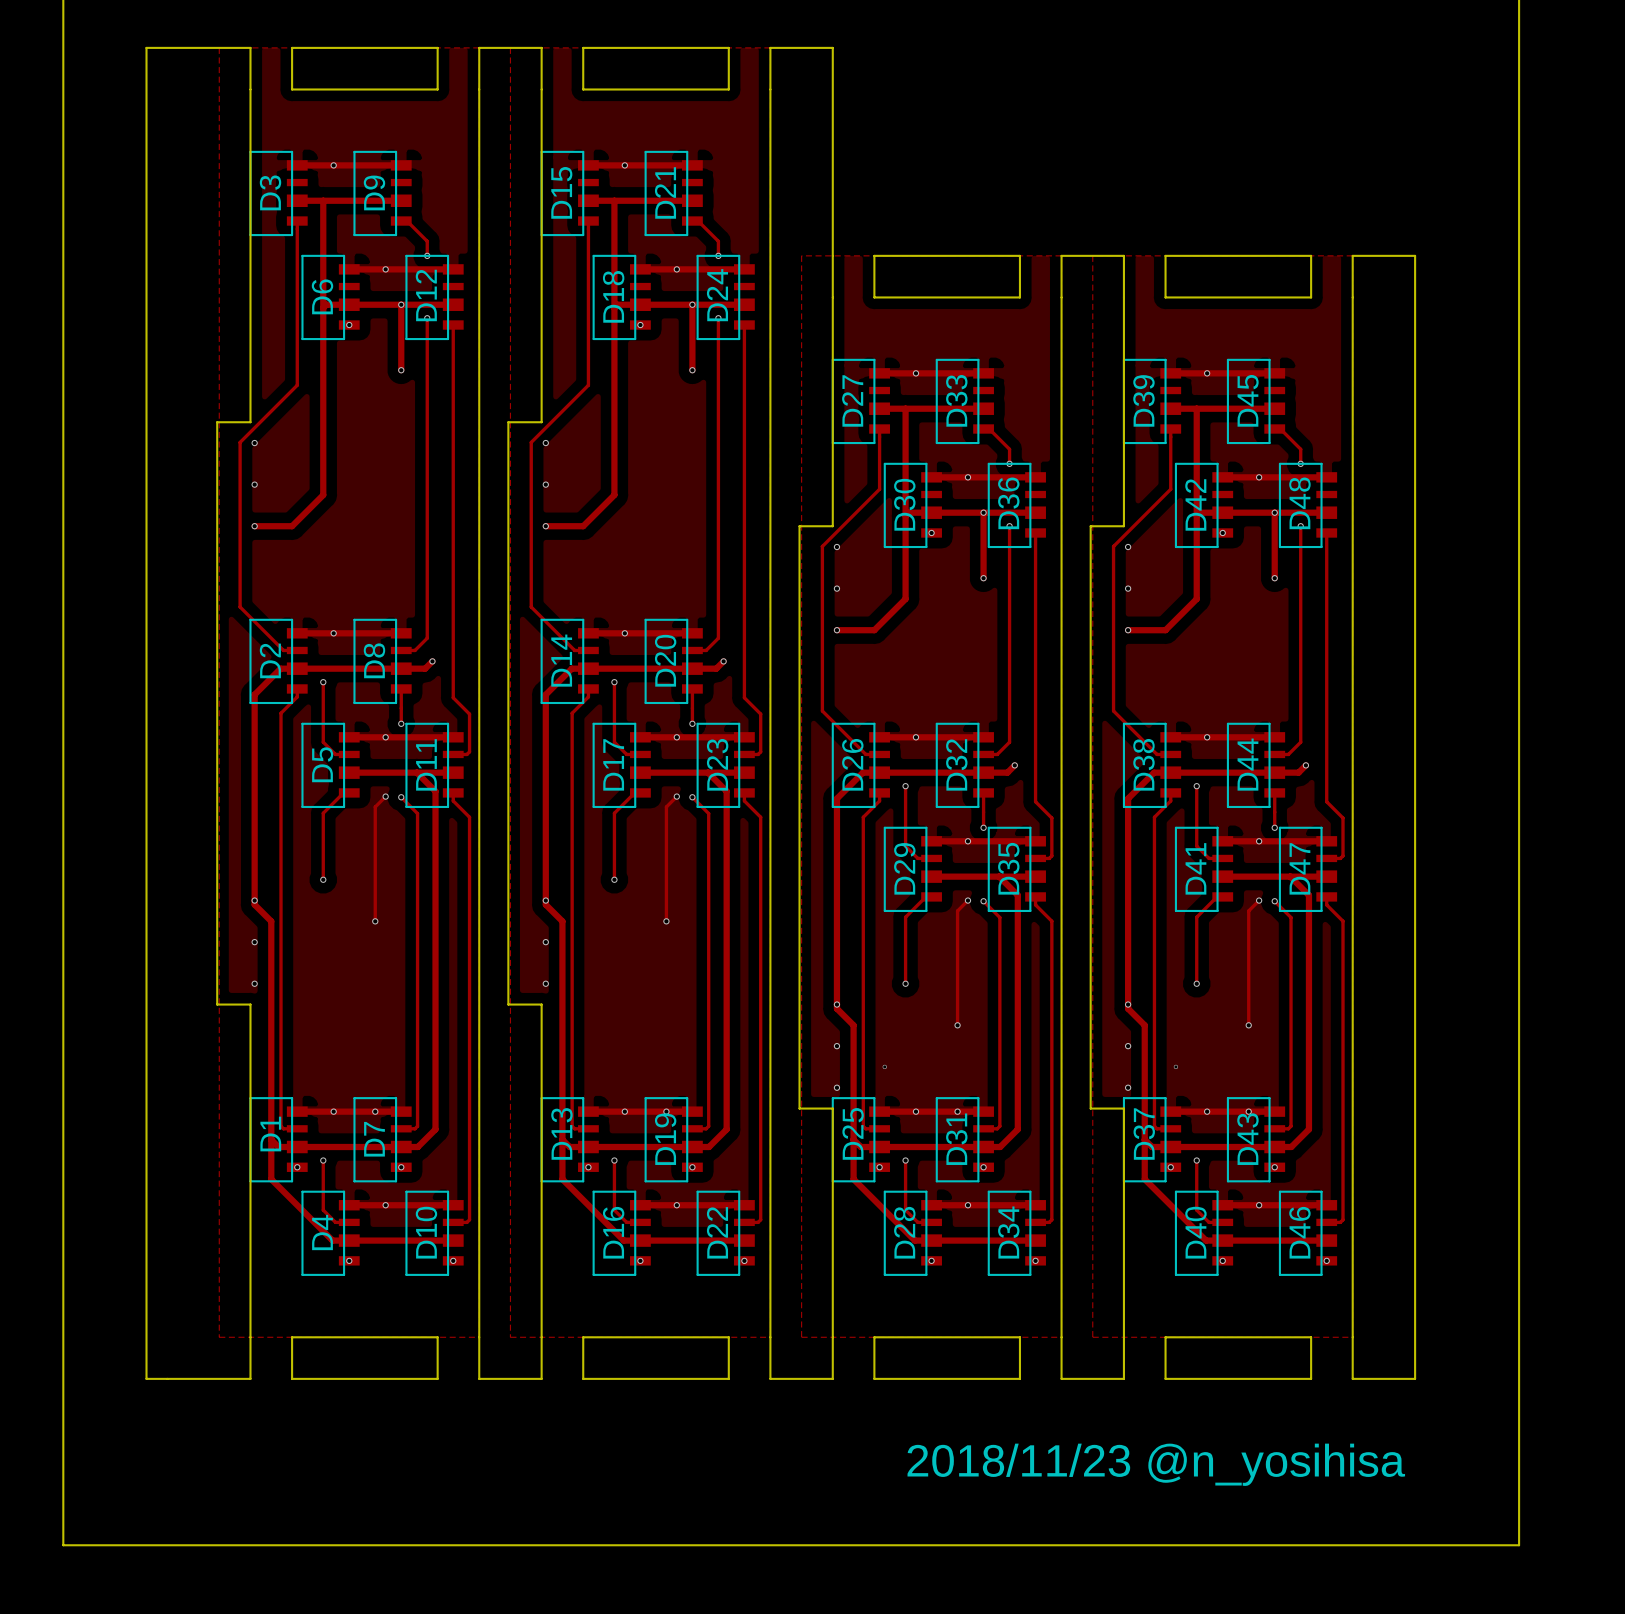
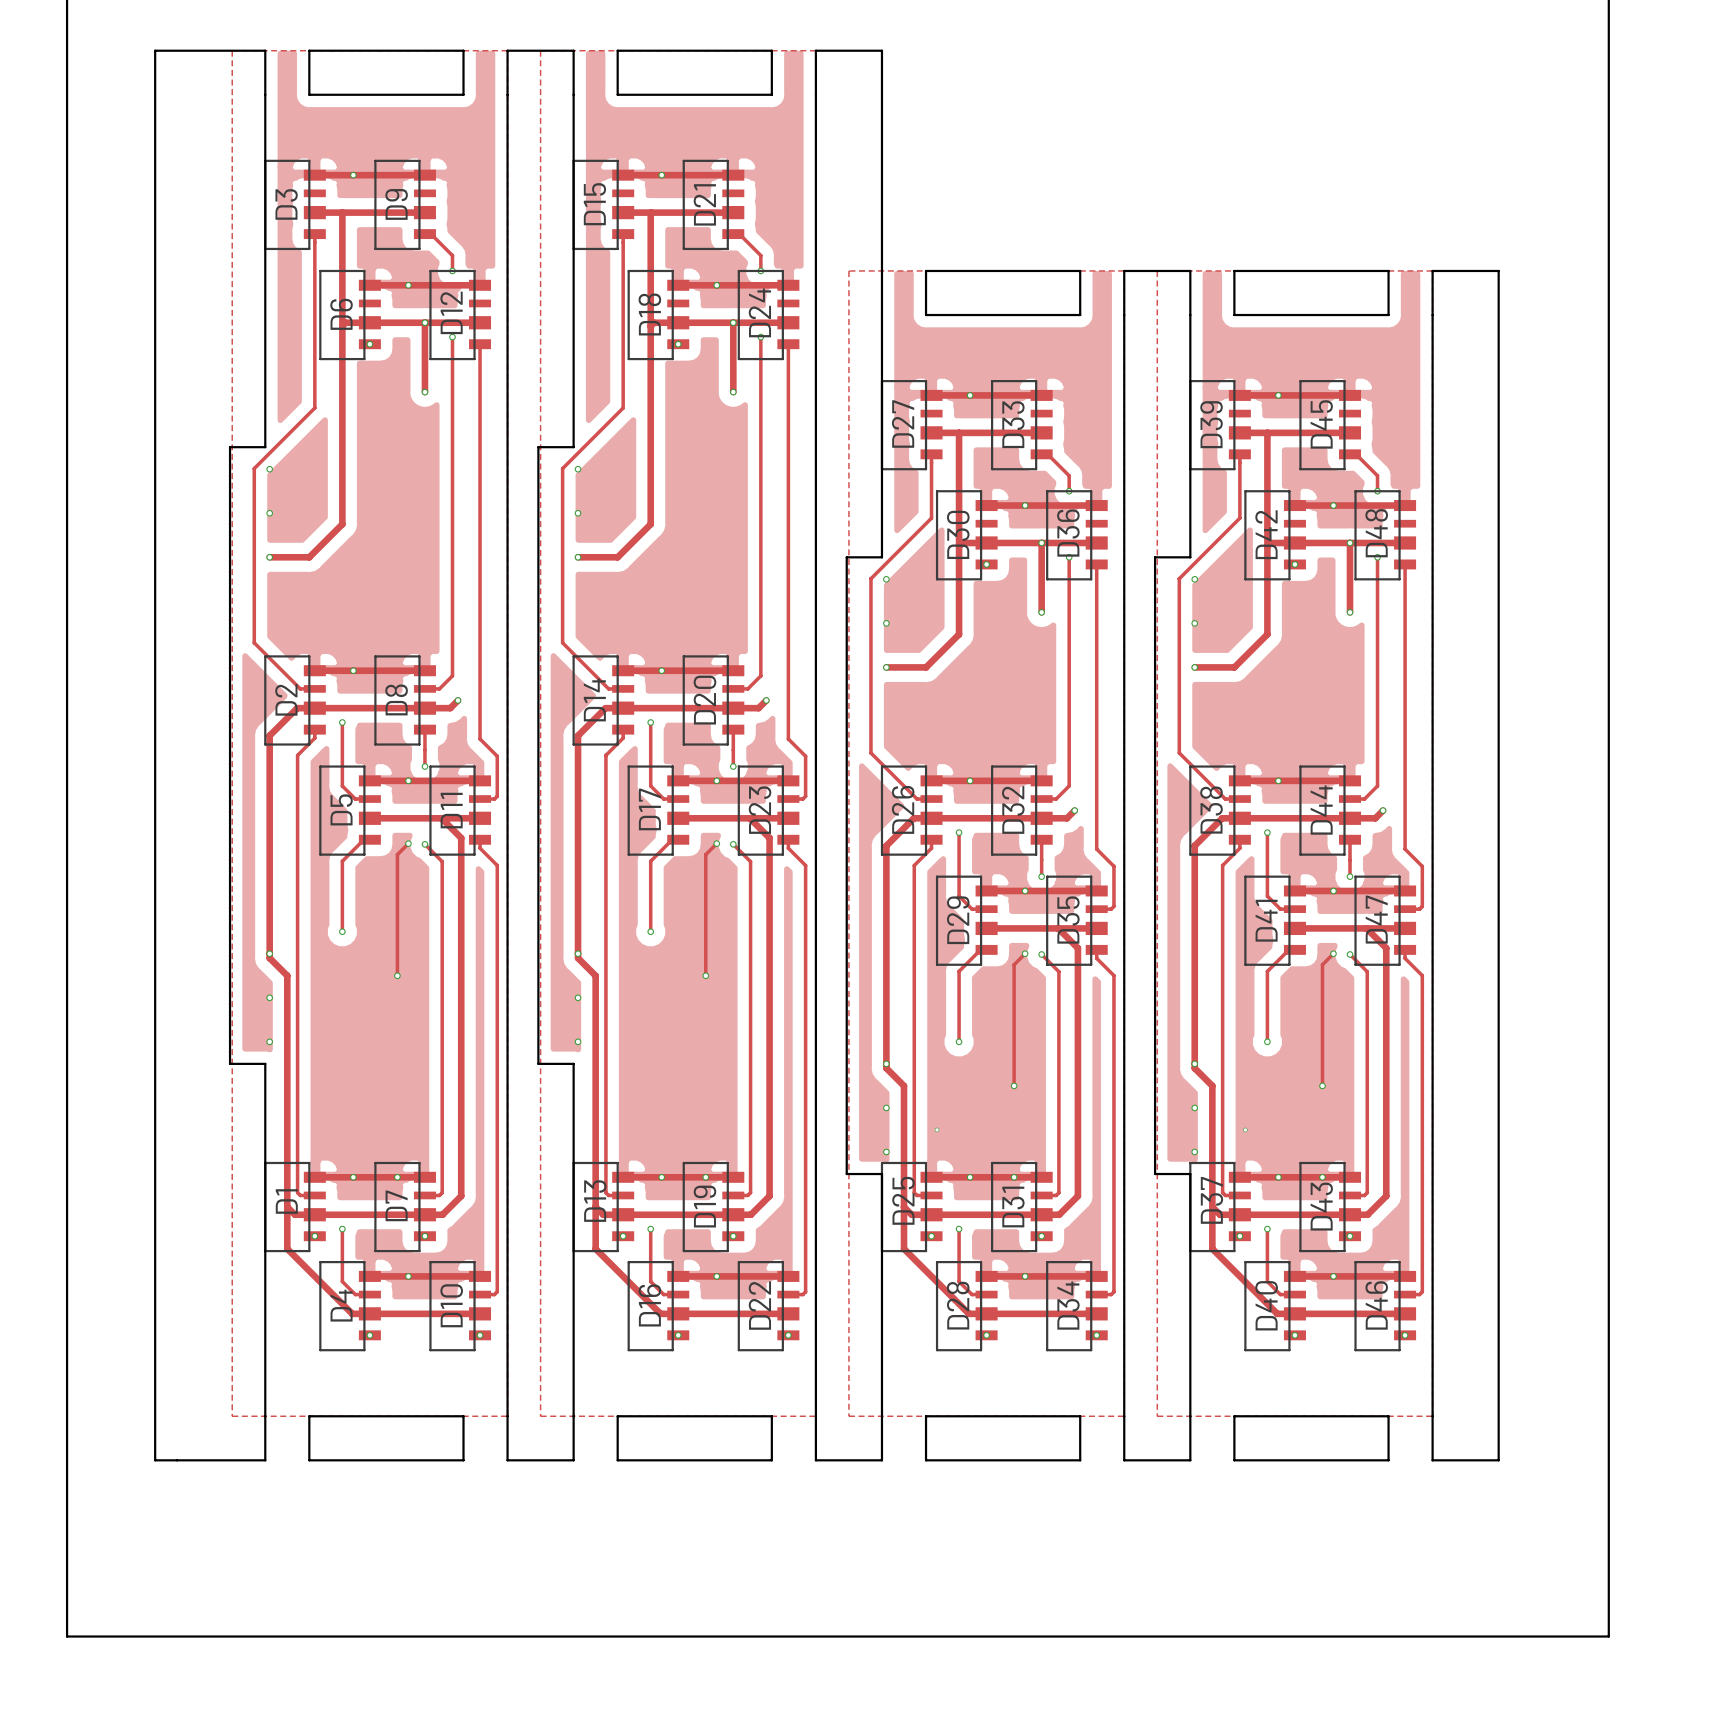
text: 2018/11/23 @n_yosihisa (1156, 1464) -> none

